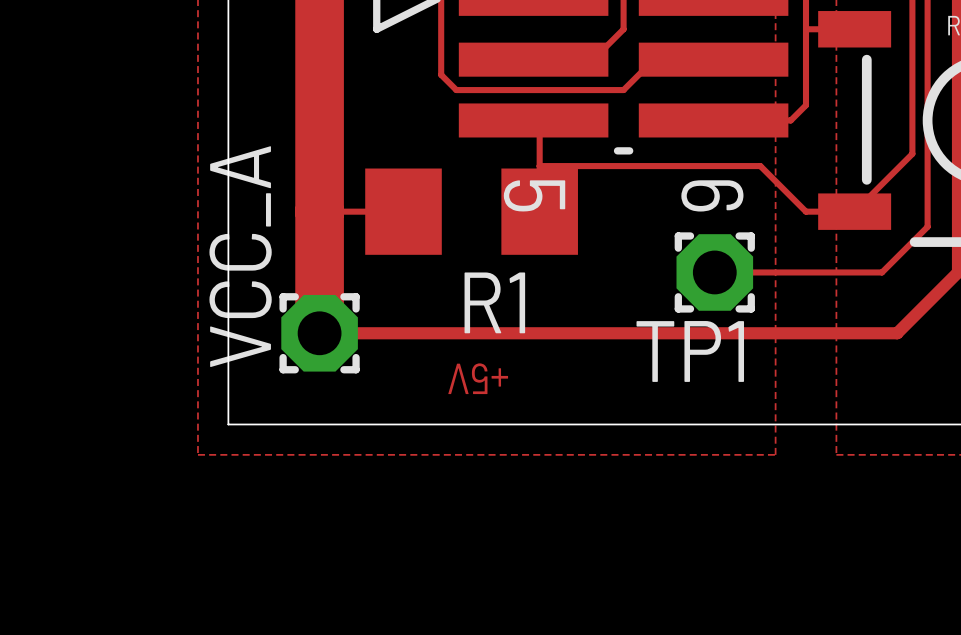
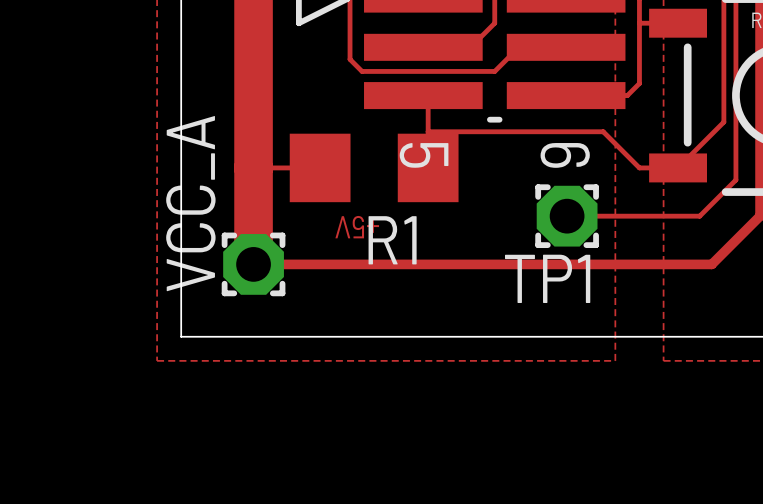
text position: +5V (478, 378) -> +5V (357, 227)

